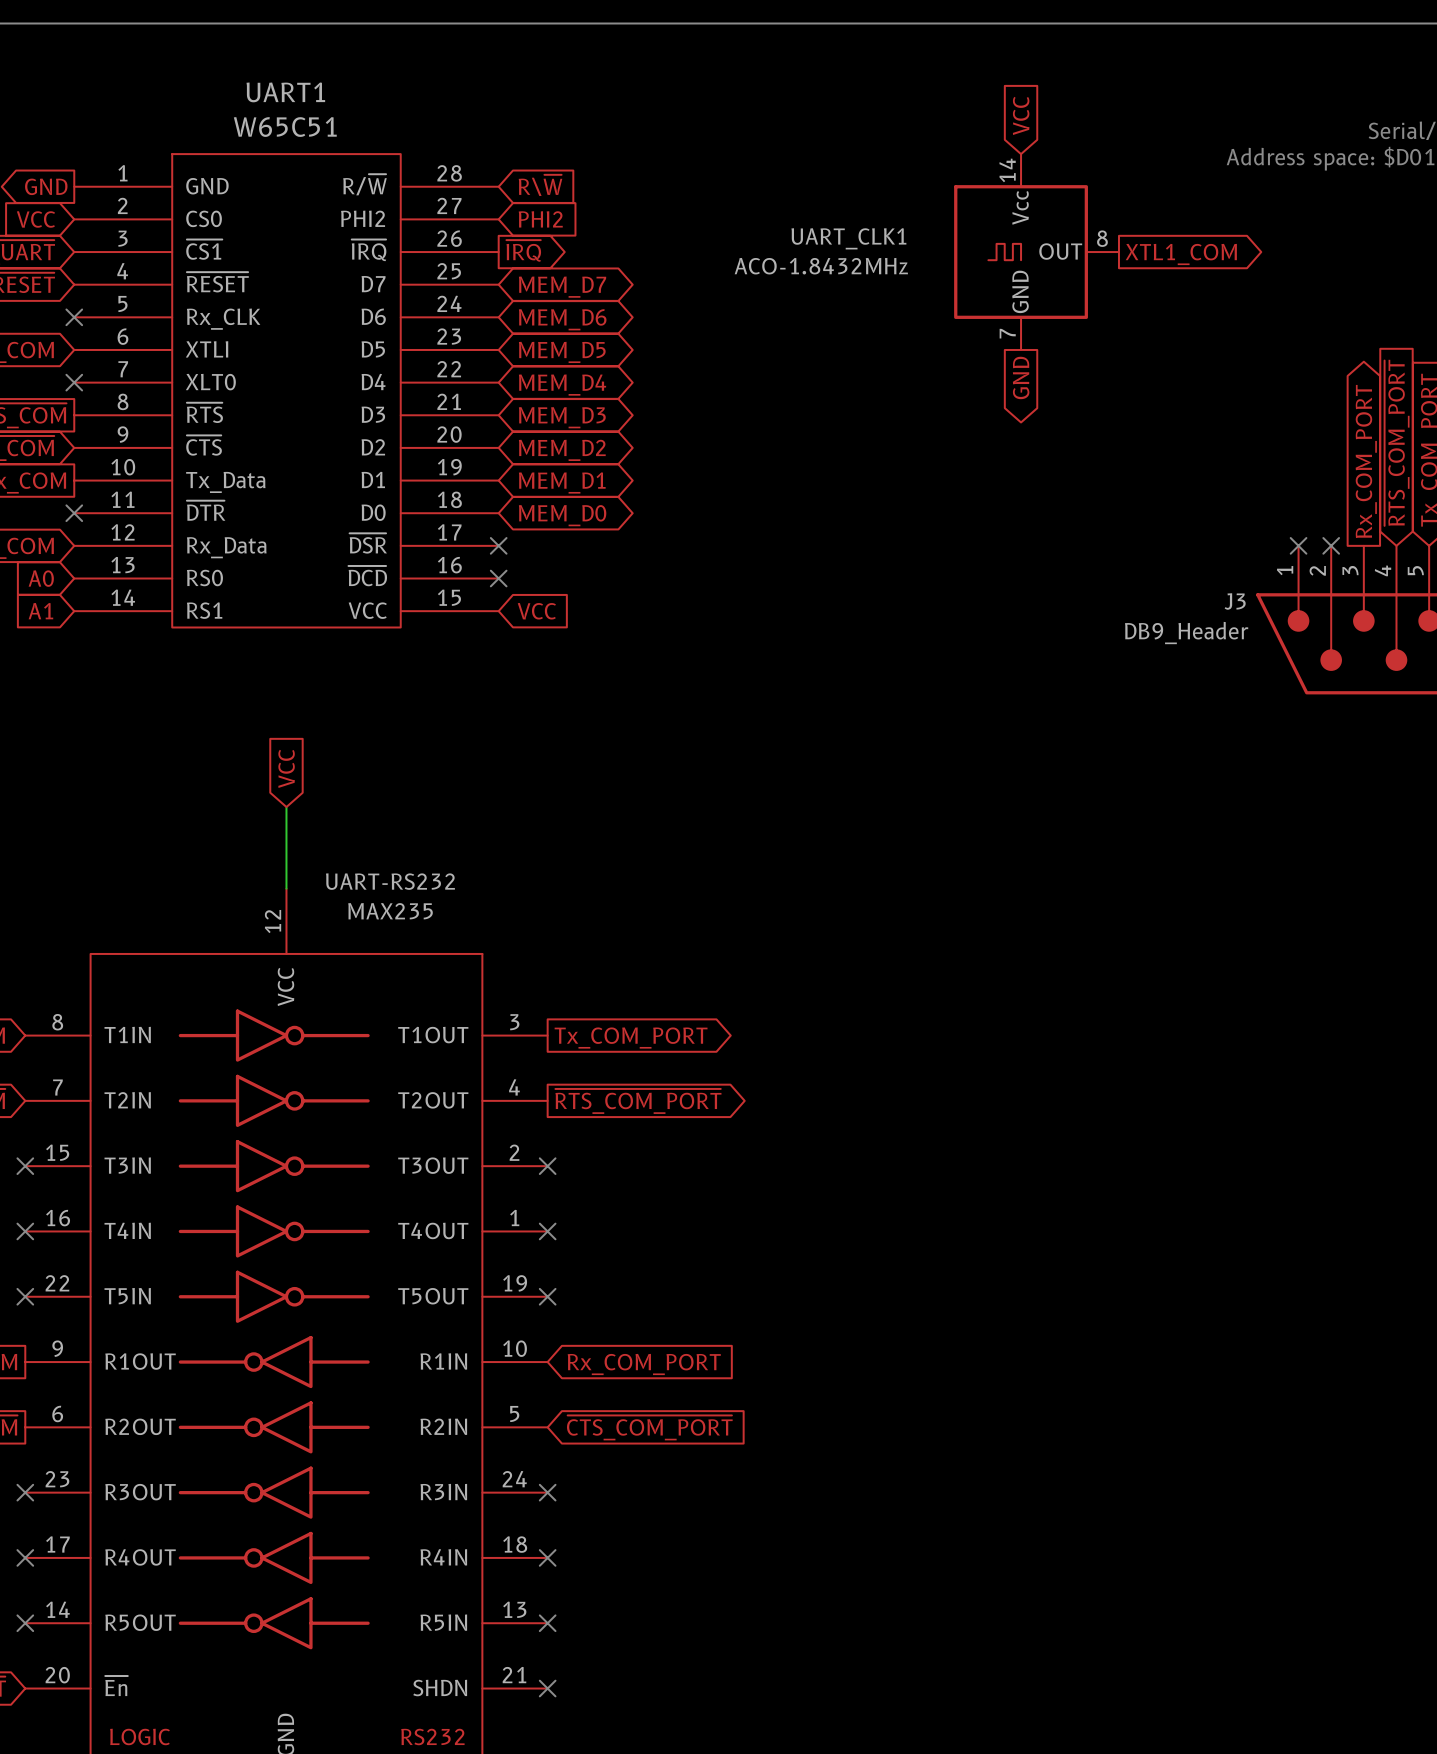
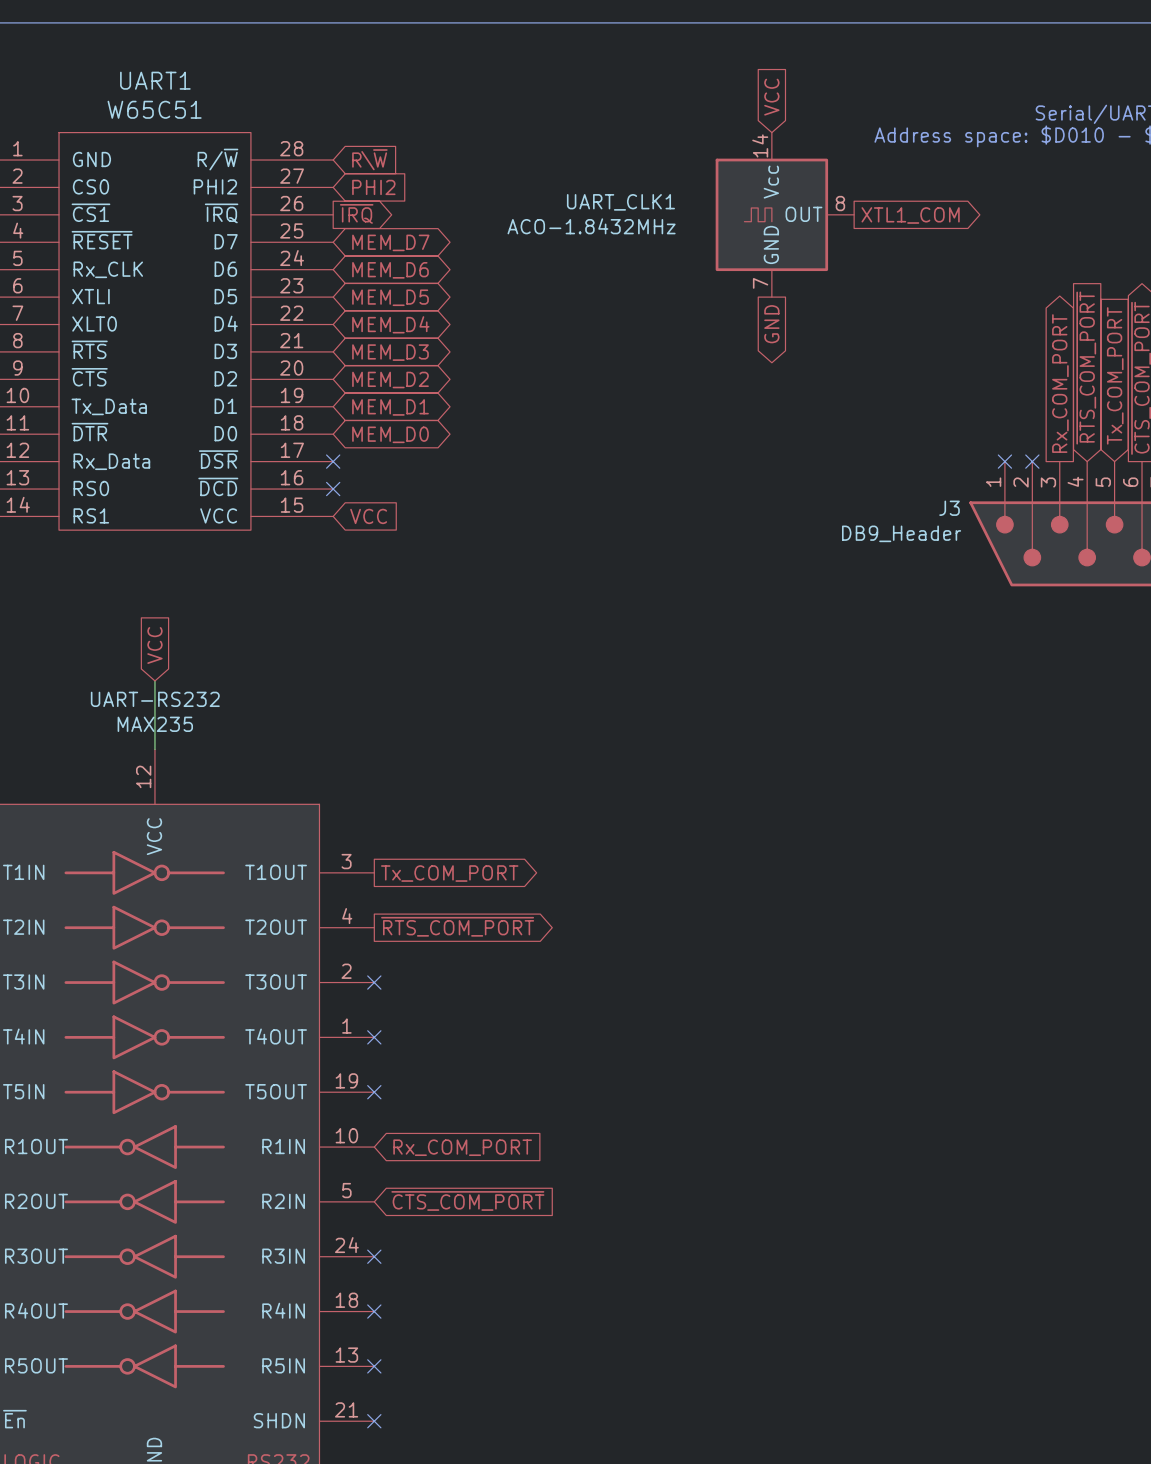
UART-RS232 name position: UART-RS232 (390, 881) -> UART-RS232 (155, 699)
UART-RS232 value position: MAX235 (390, 911) -> MAX235 (155, 724)

